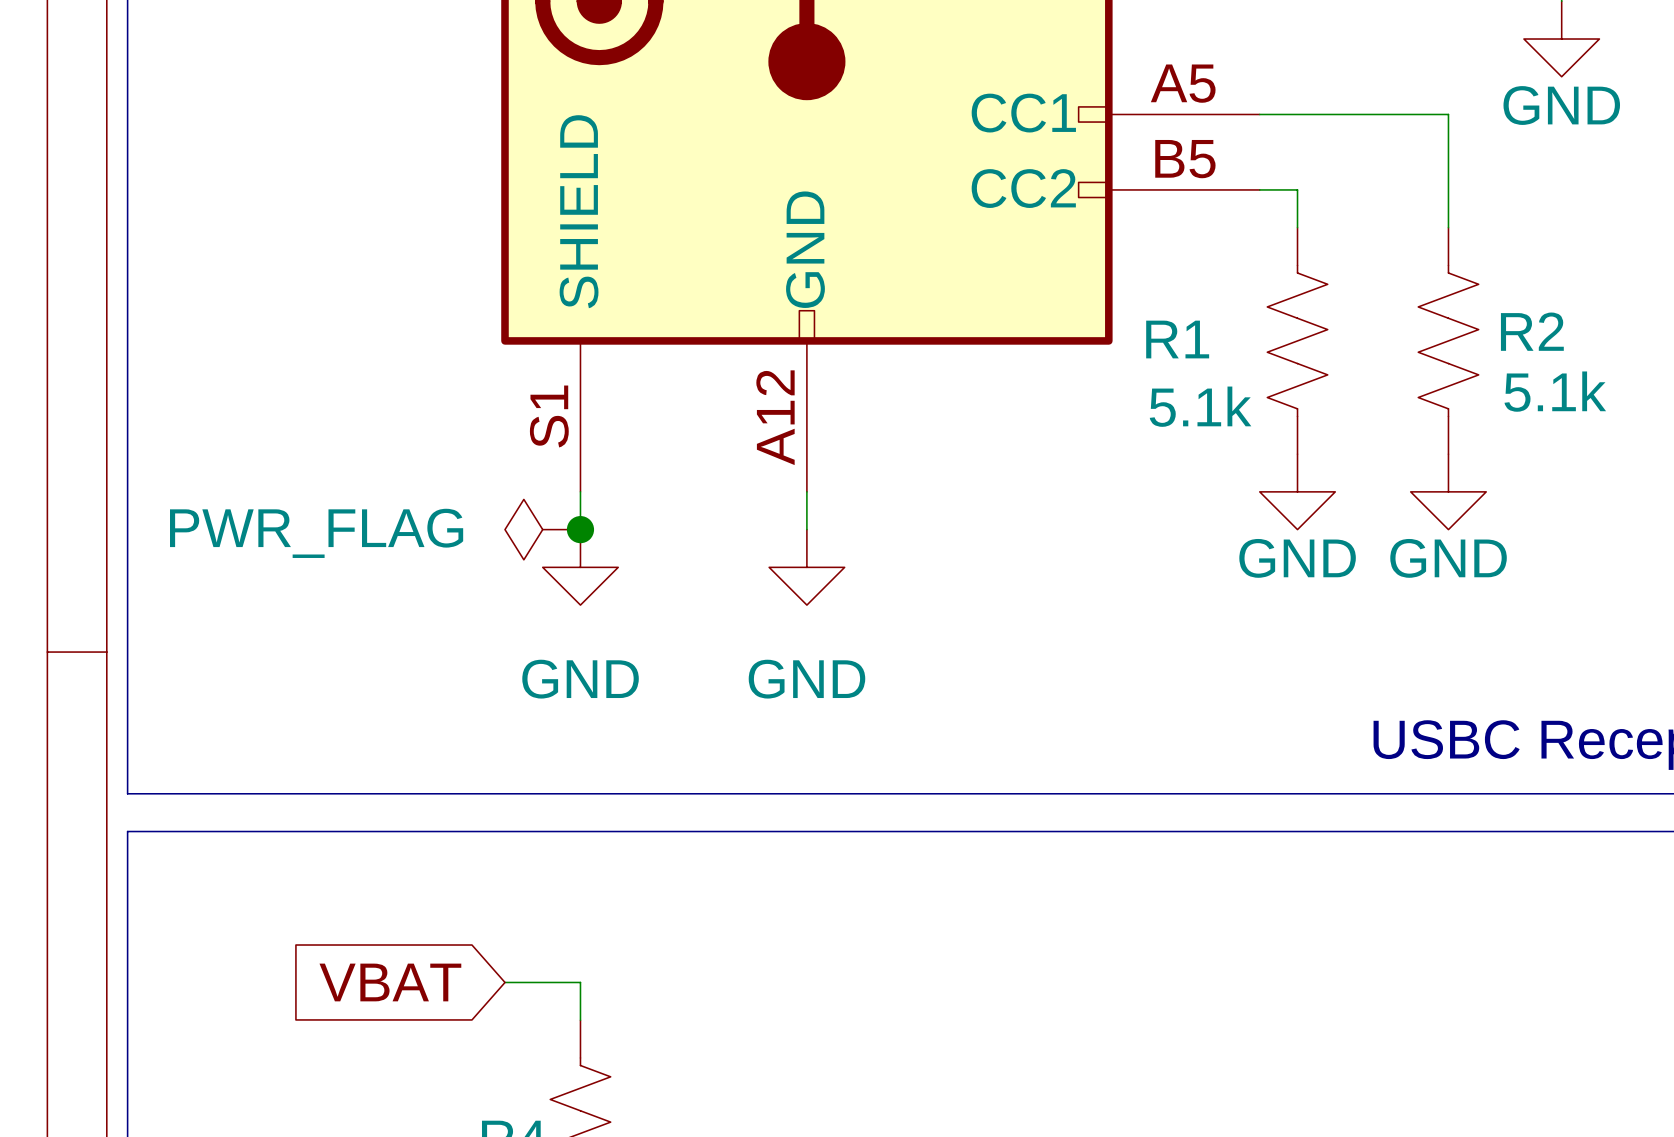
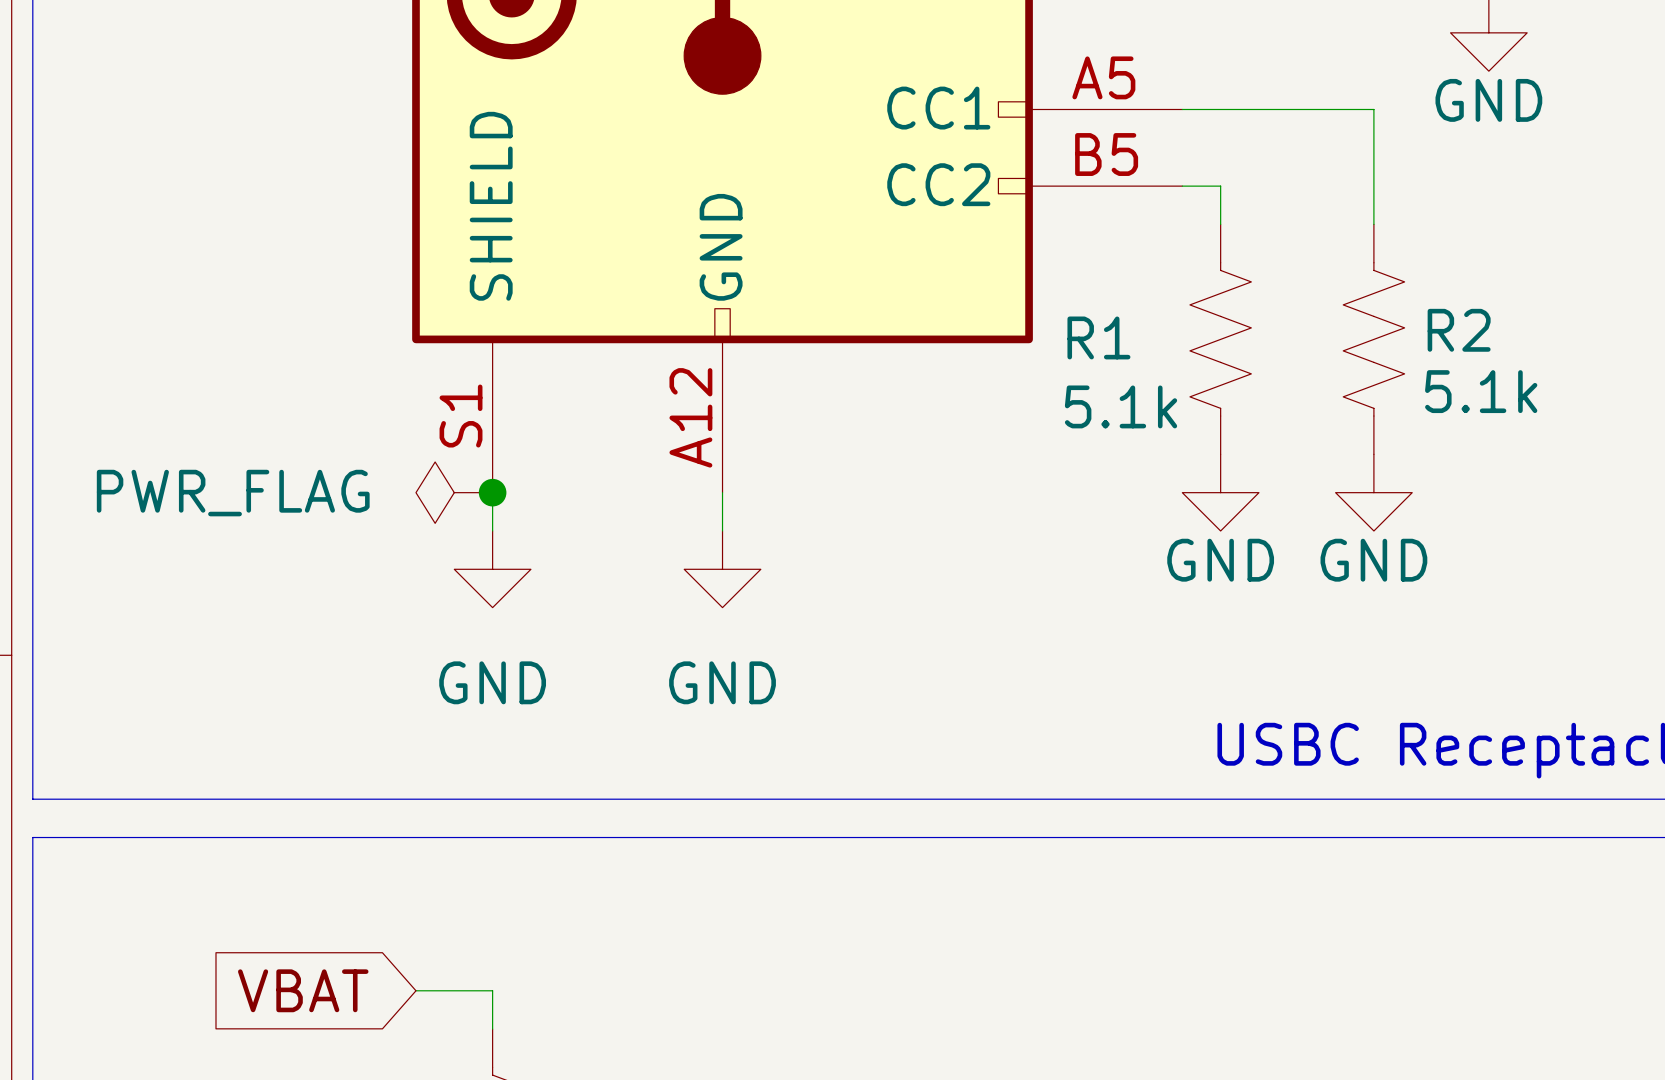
power symbol position: PWR_FLAG (542, 529) -> PWR_FLAG (454, 492)
junction position: (580, 529) -> (492, 492)

